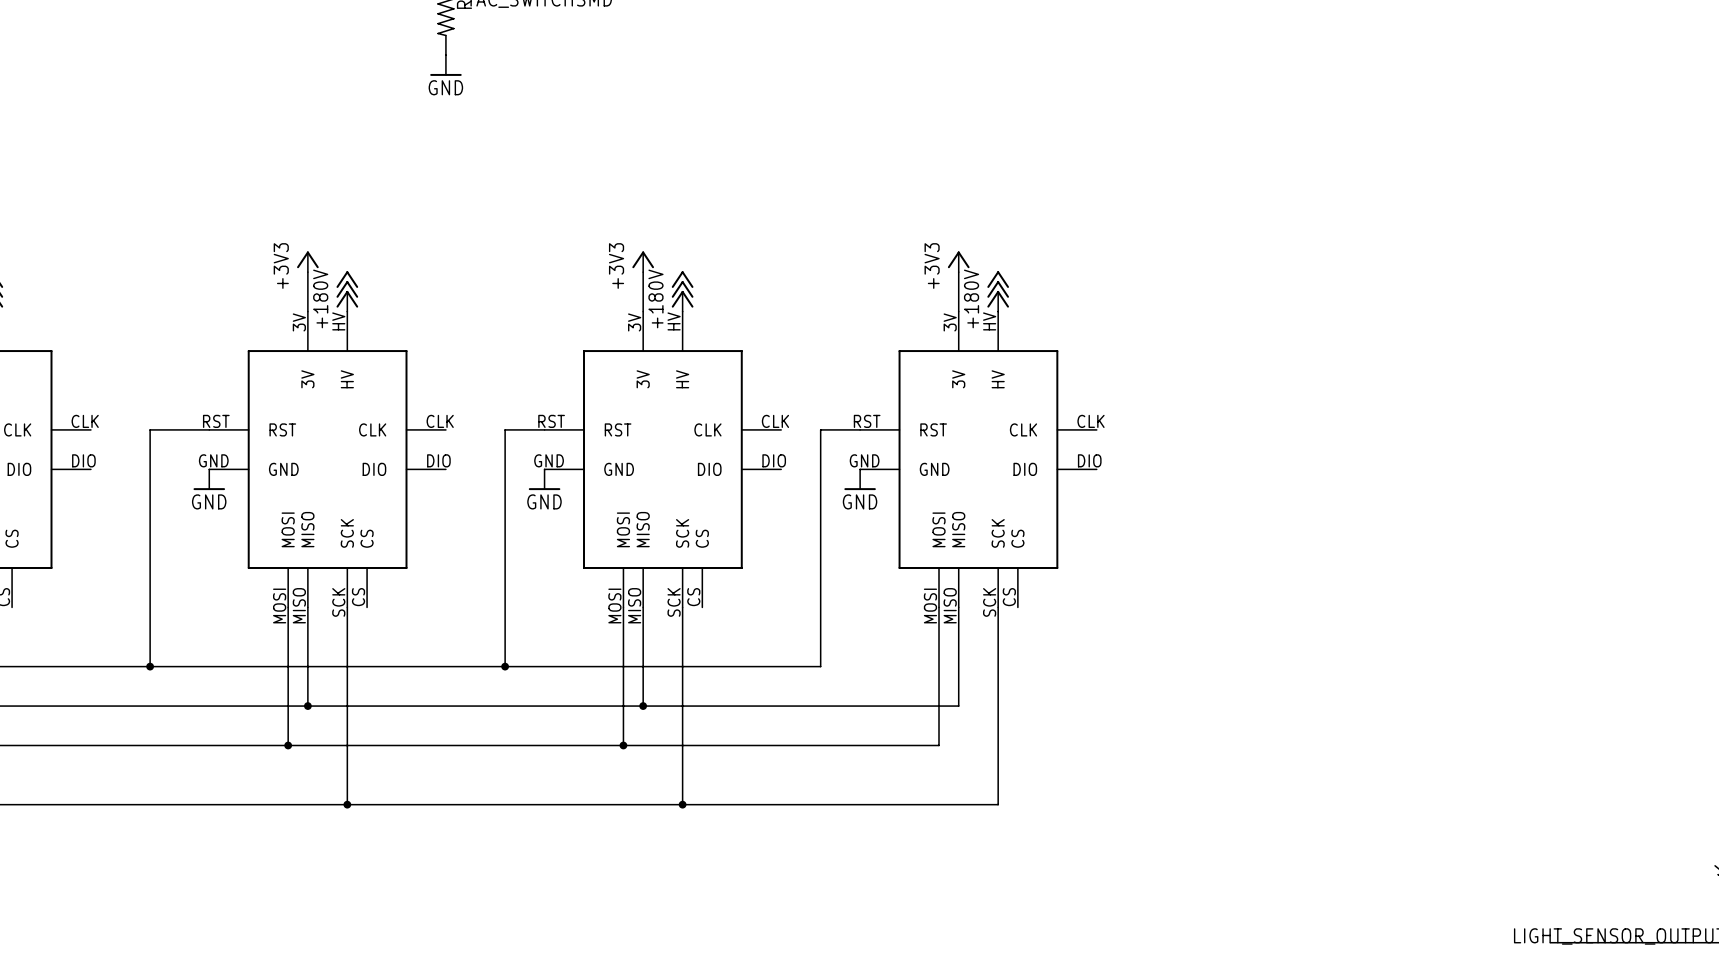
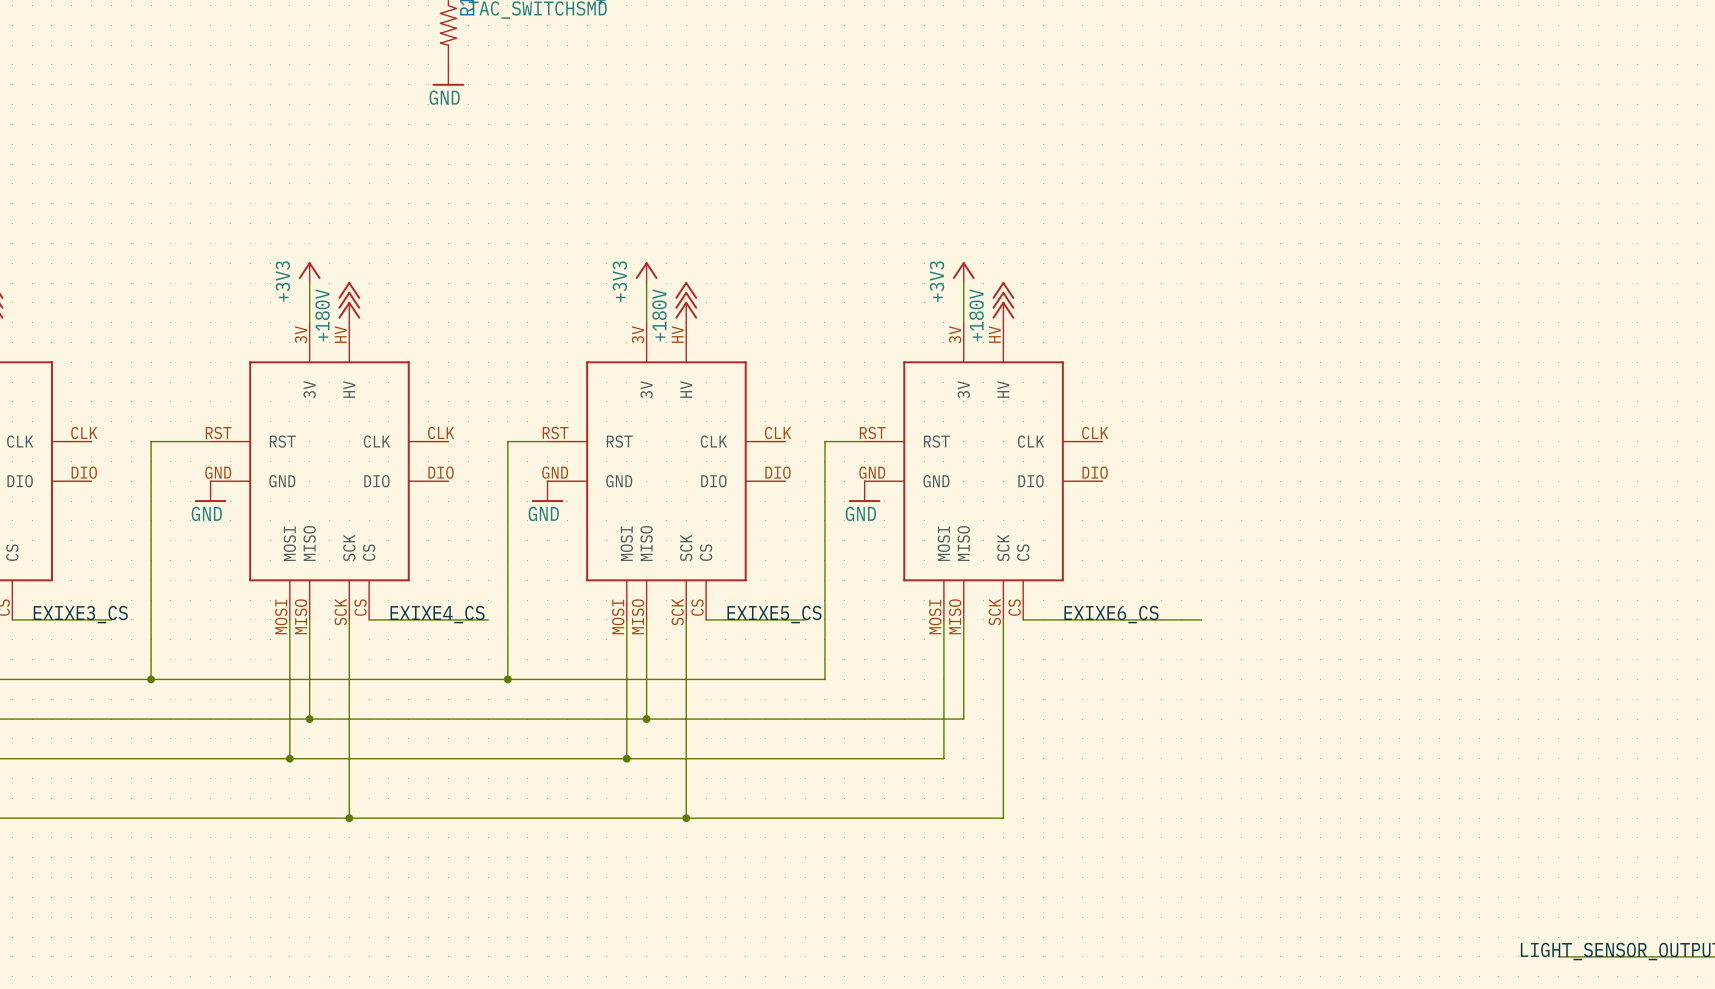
label: none -> EXIXE4_CS (437, 614)
label: none -> EXIXE3_CS (80, 614)
label: none -> EXIXE5_CS (774, 614)
label: none -> EXIXE6_CS (1111, 614)
wire: none -> (12, 619) (111, 619)
wire: none -> (369, 619) (488, 619)
wire: none -> (706, 619) (805, 619)
wire: none -> (1023, 619) (1201, 619)

